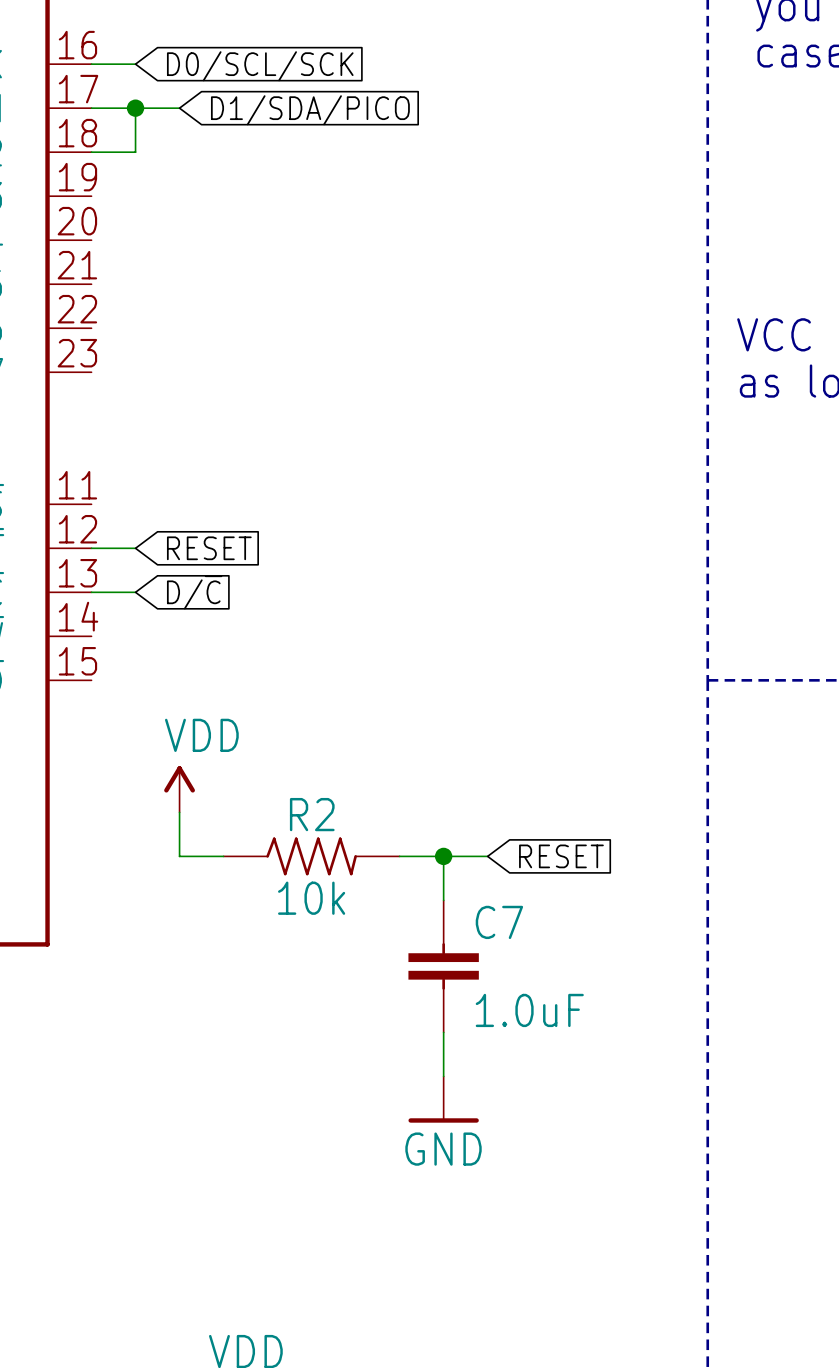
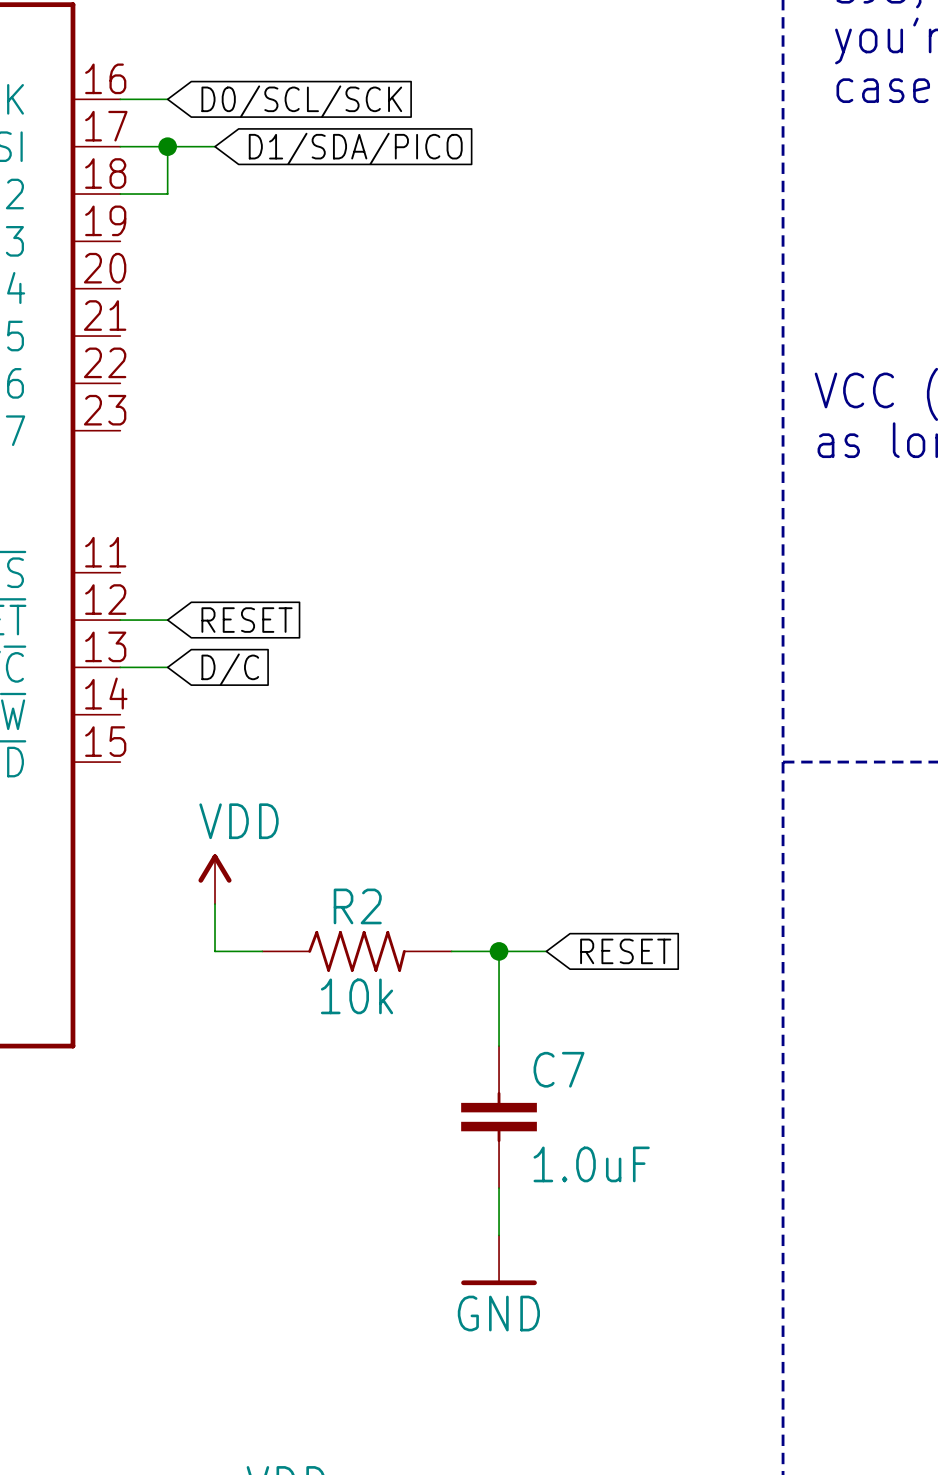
global label: D/~{C} (194, 592) -> D/C (230, 669)
C7 position: (443, 966) -> (499, 1117)
power symbol position: GND (443, 1099) -> GND (499, 1260)

